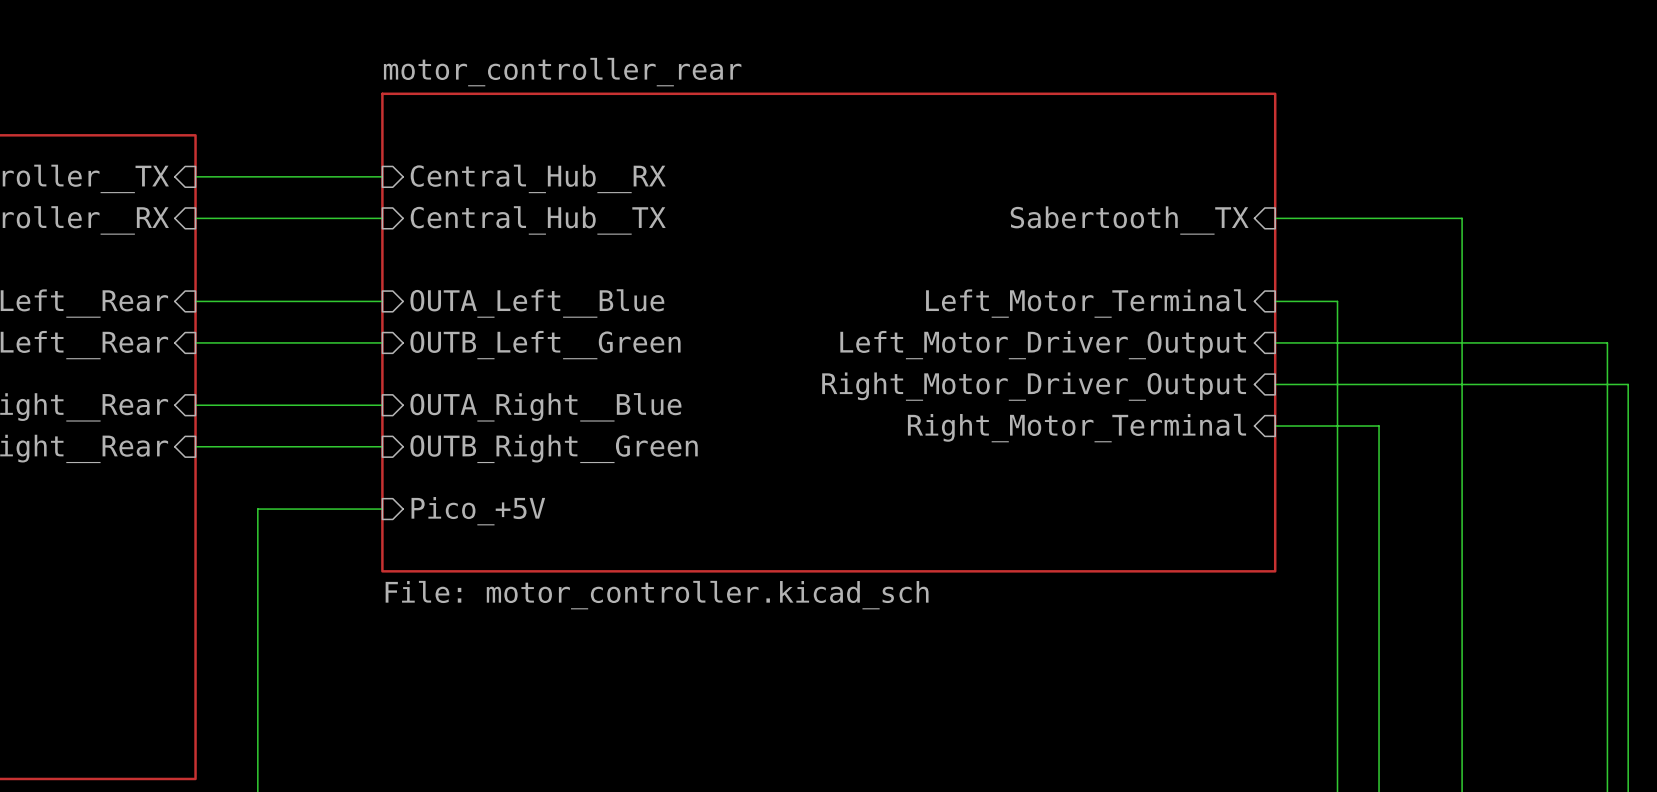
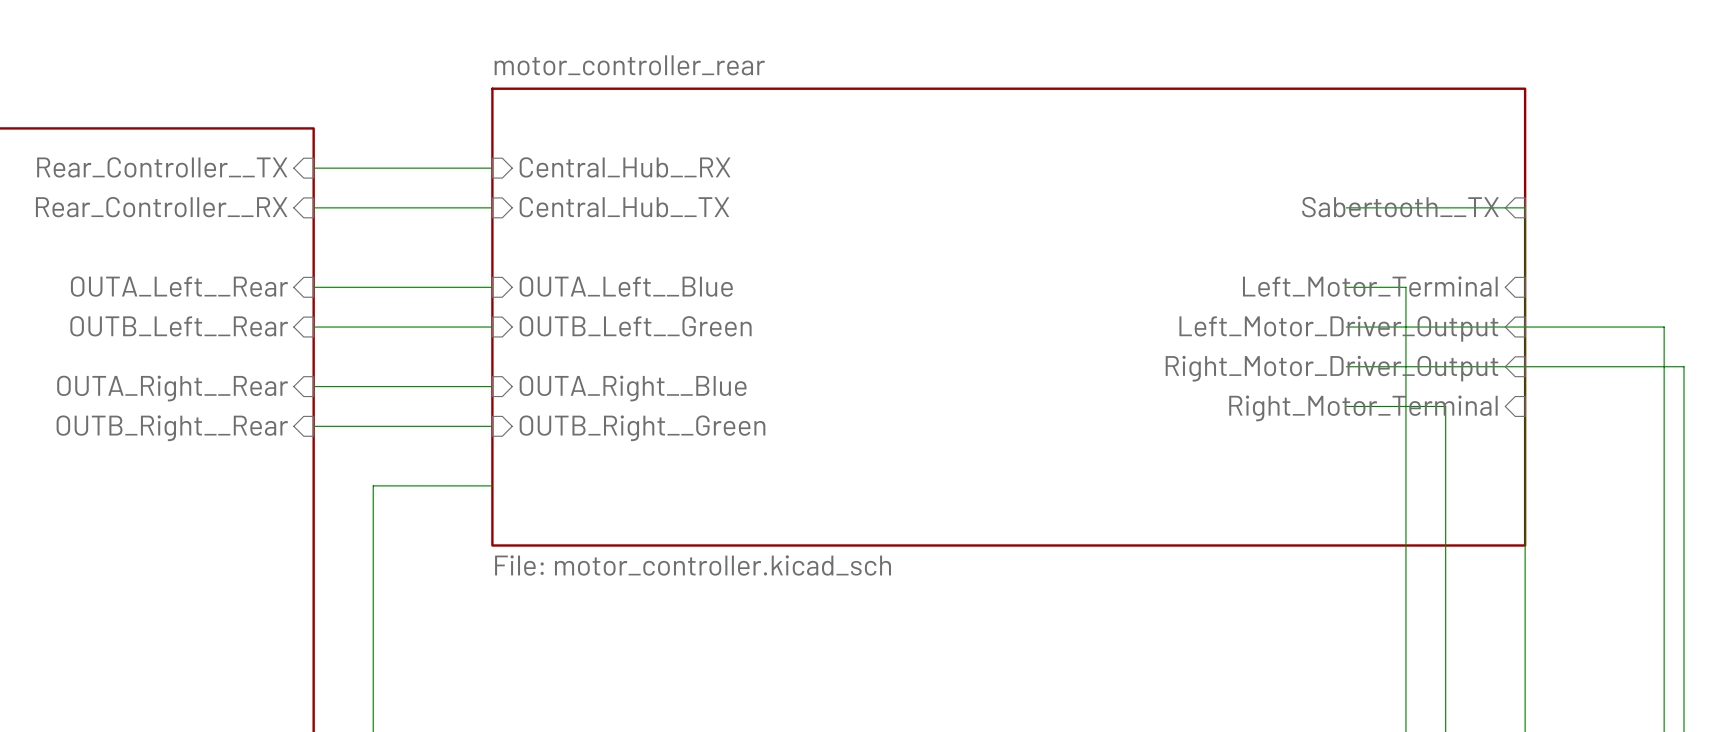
sheet pin position: Sabertooth__TX (1129, 220) -> Sabertooth__TX (1400, 207)
sheet pin position: Left_Motor_Terminal (1086, 303) -> Left_Motor_Terminal (1370, 286)
sheet motor_controller_rear: File: motor_controller.kicad_sch (828, 332) -> none
sheet motor_controller_rear: none -> File: motor_controller.kicad_sch (1008, 317)
sheet pin position: Left_Motor_Driver_Output (1043, 345) -> Left_Motor_Driver_Output (1338, 328)
sheet pin position: Right_Motor_Driver_Output (1034, 386) -> Right_Motor_Driver_Output (1332, 368)
sheet pin position: Right_Motor_Terminal (1077, 428) -> Right_Motor_Terminal (1363, 408)
sheet pin: Pico_+5V (478, 511) -> none

